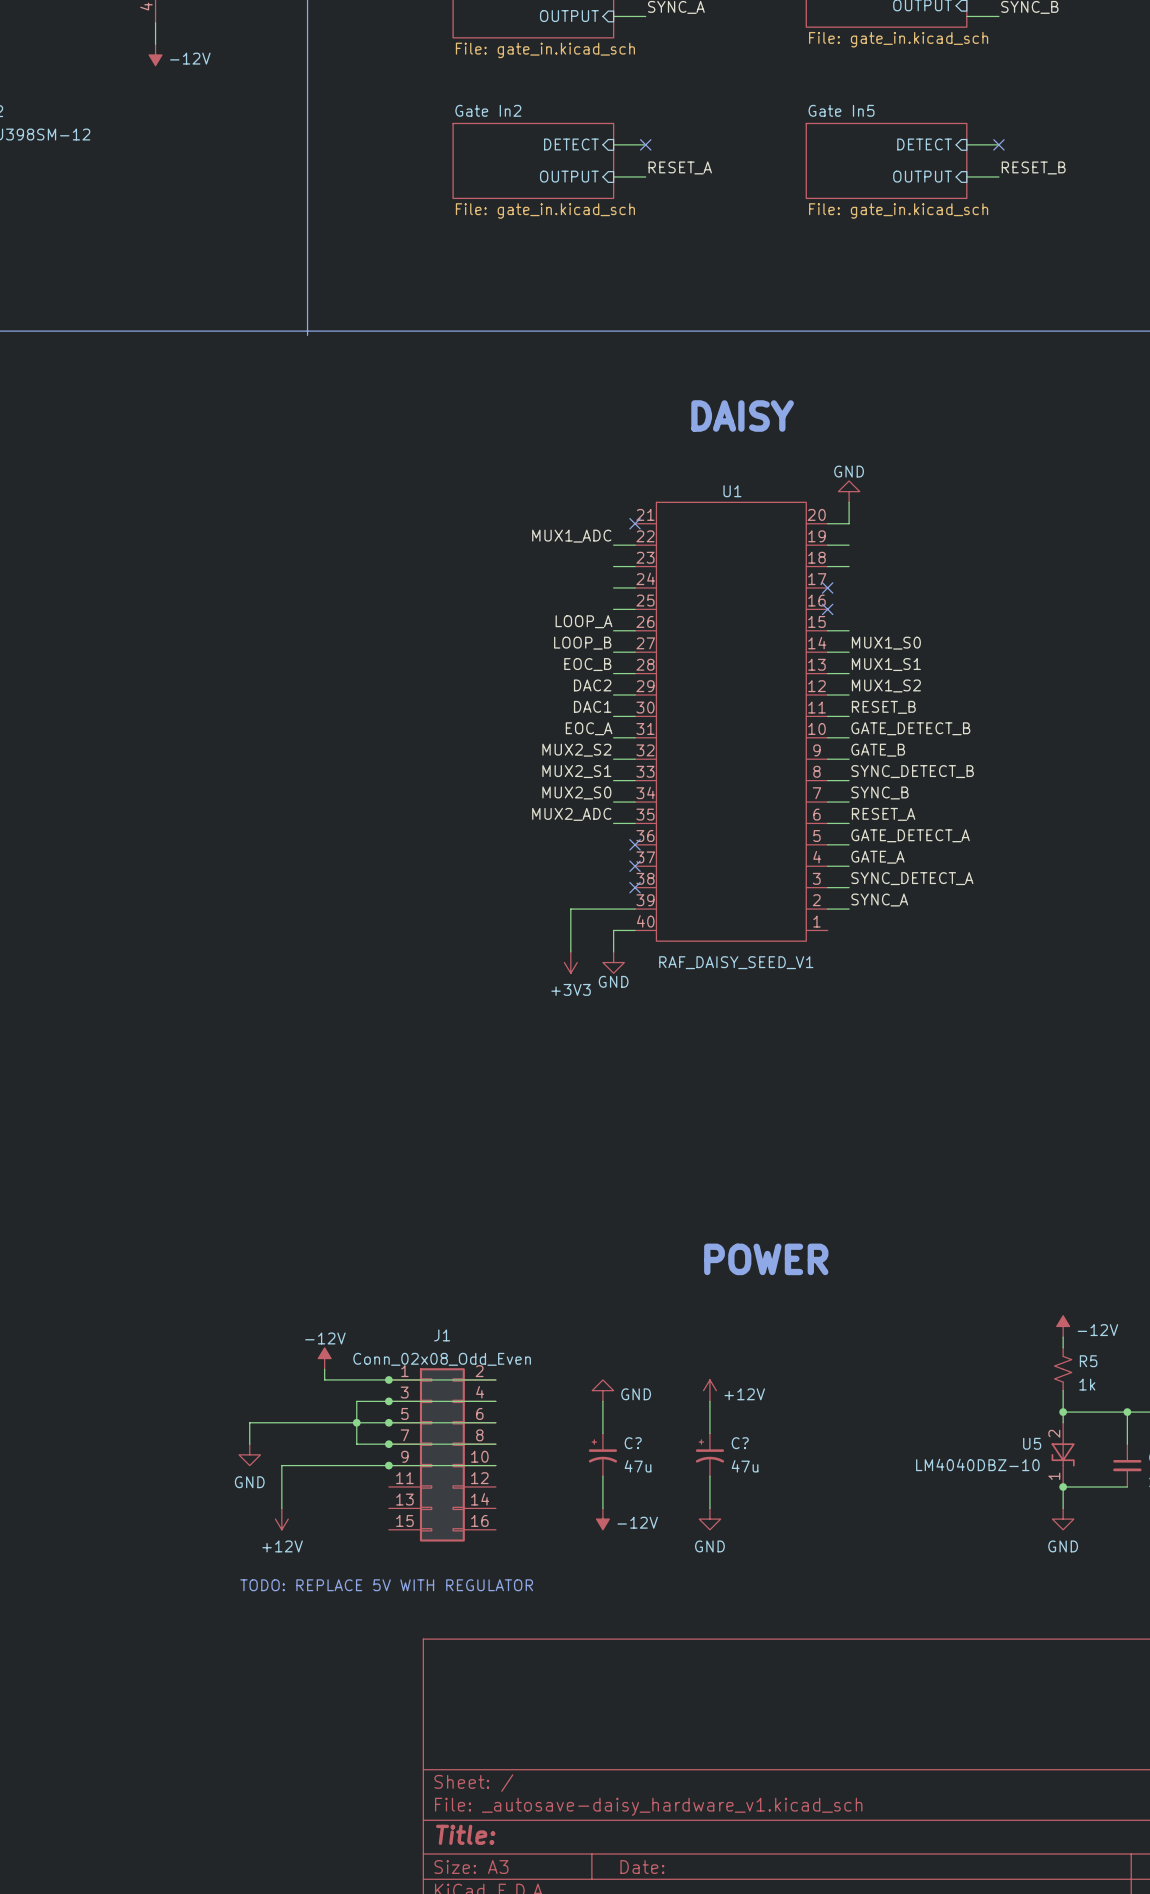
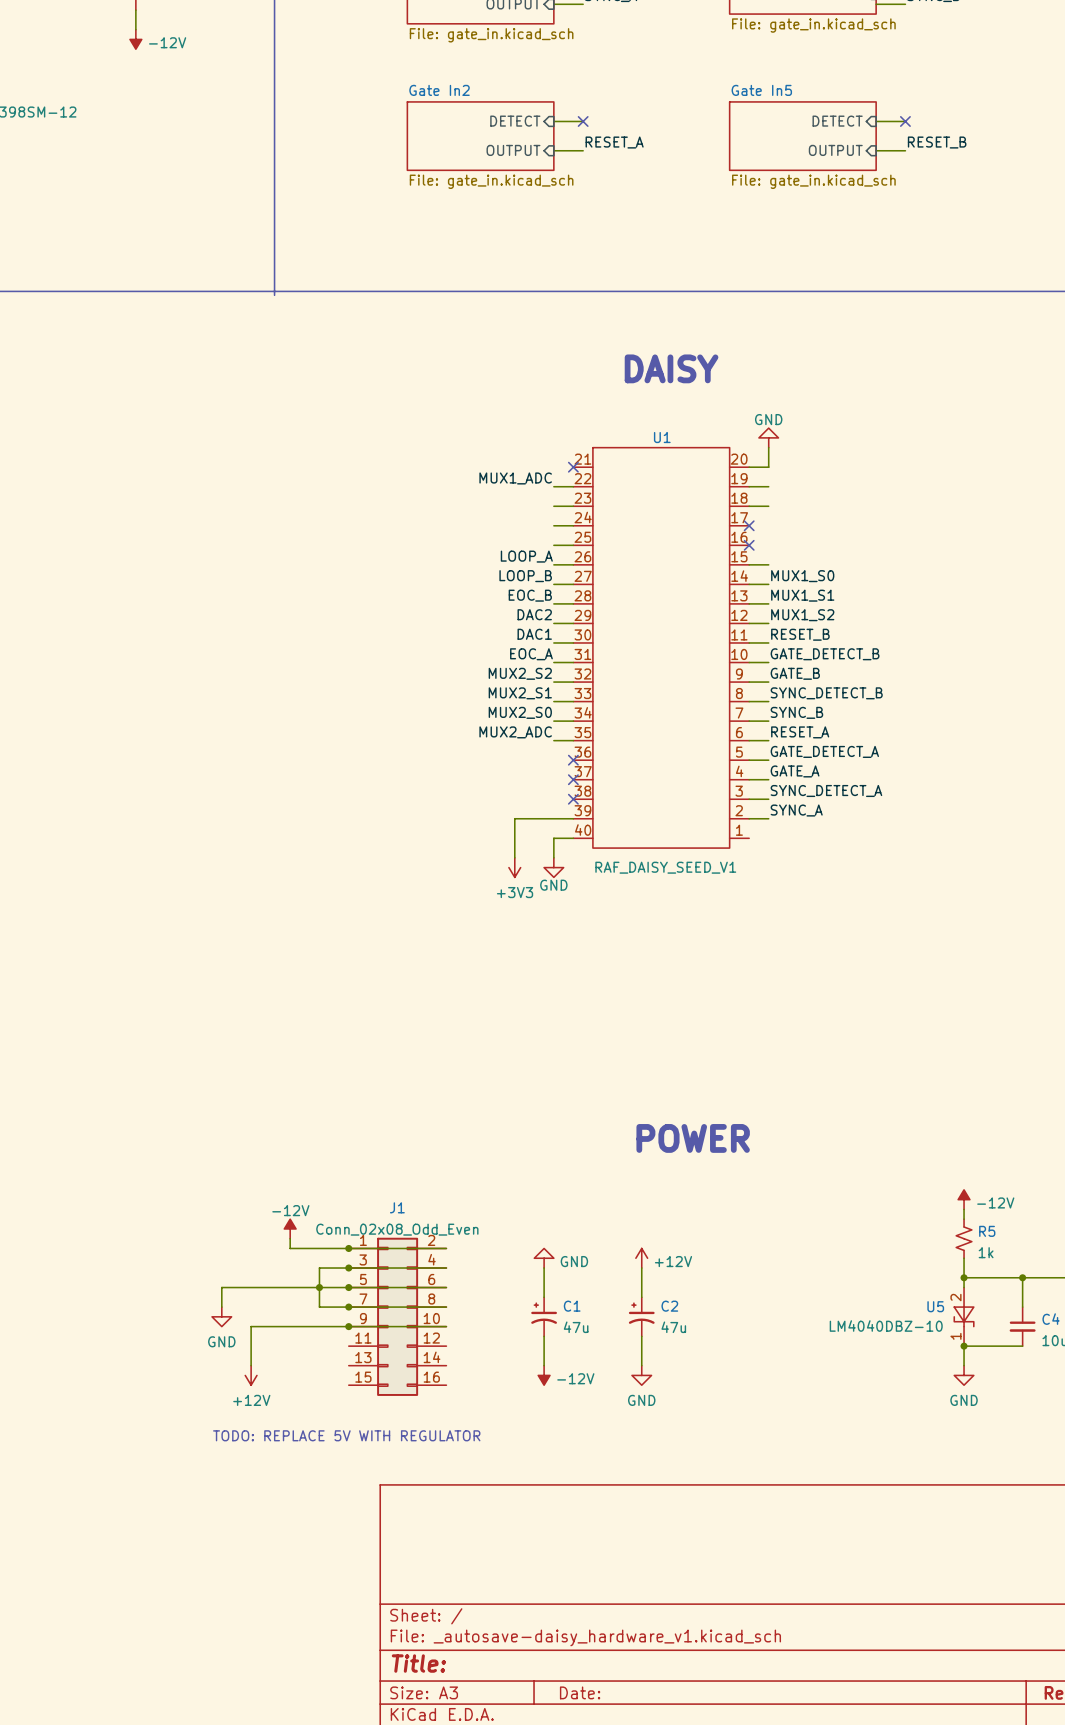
C? name: C? (633, 1443) -> C1 (572, 1306)
C? name: C? (740, 1443) -> C2 (669, 1306)

